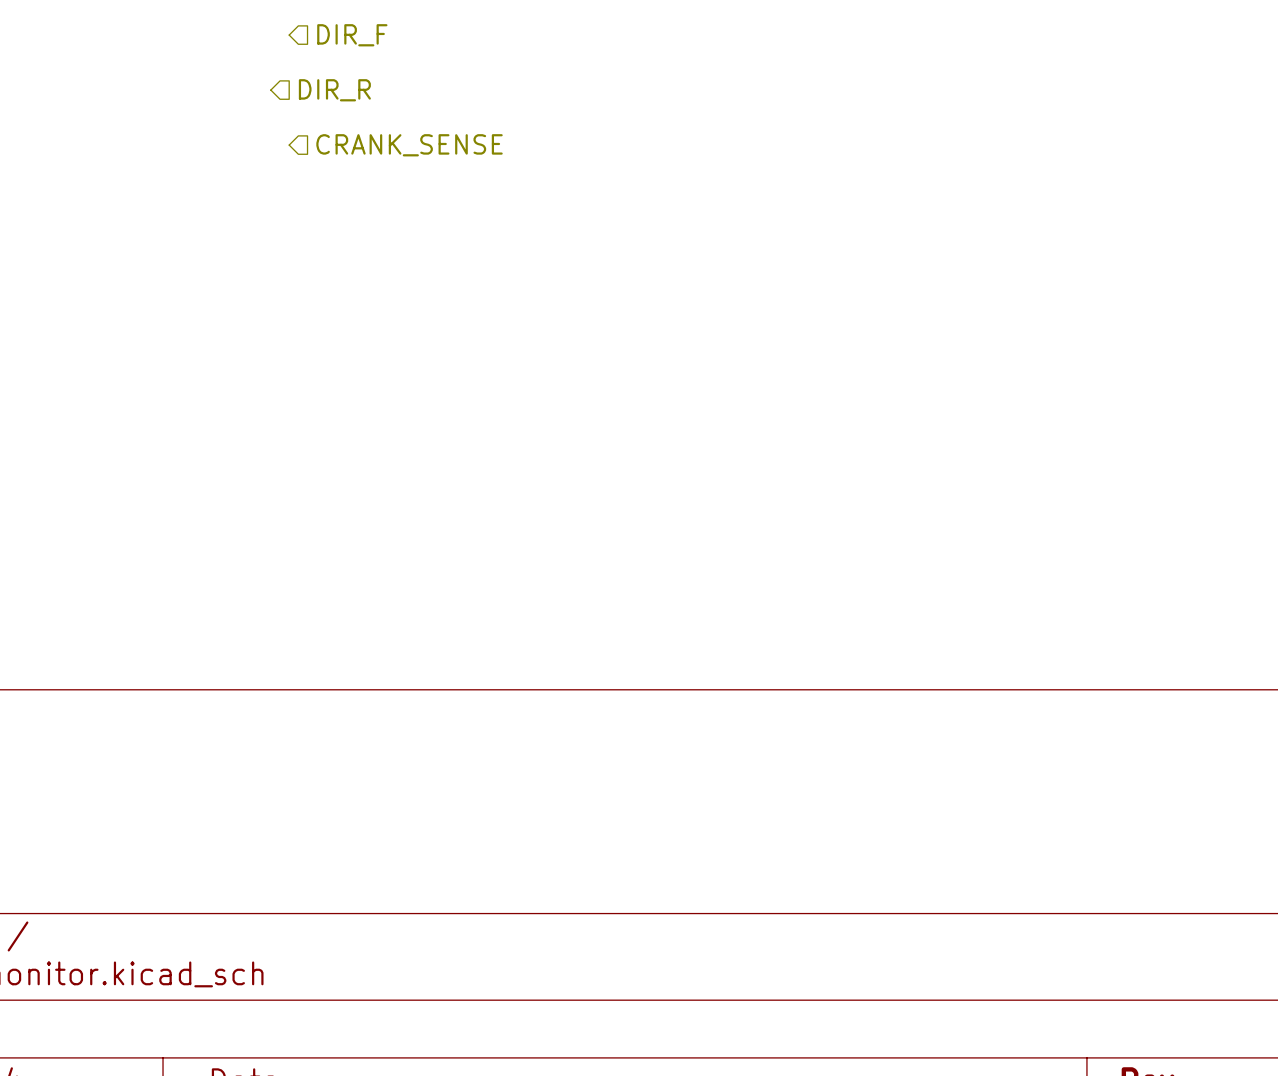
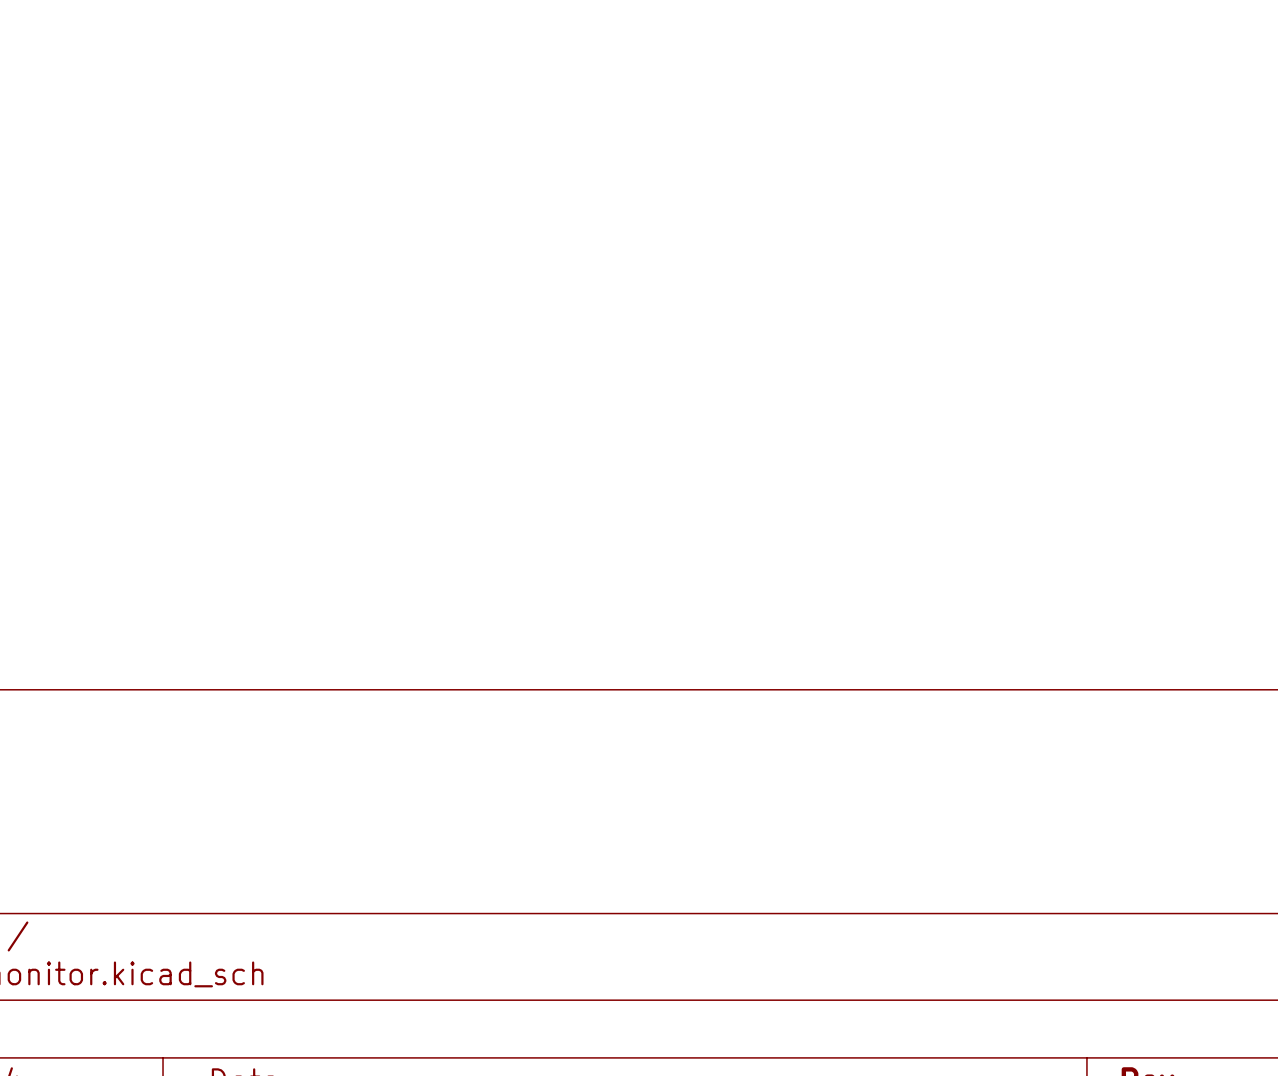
hierarchical label: DIR_F (352, 35) -> none
hierarchical label: DIR_R (334, 90) -> none
hierarchical label: CRANK_SENSE (409, 145) -> none

